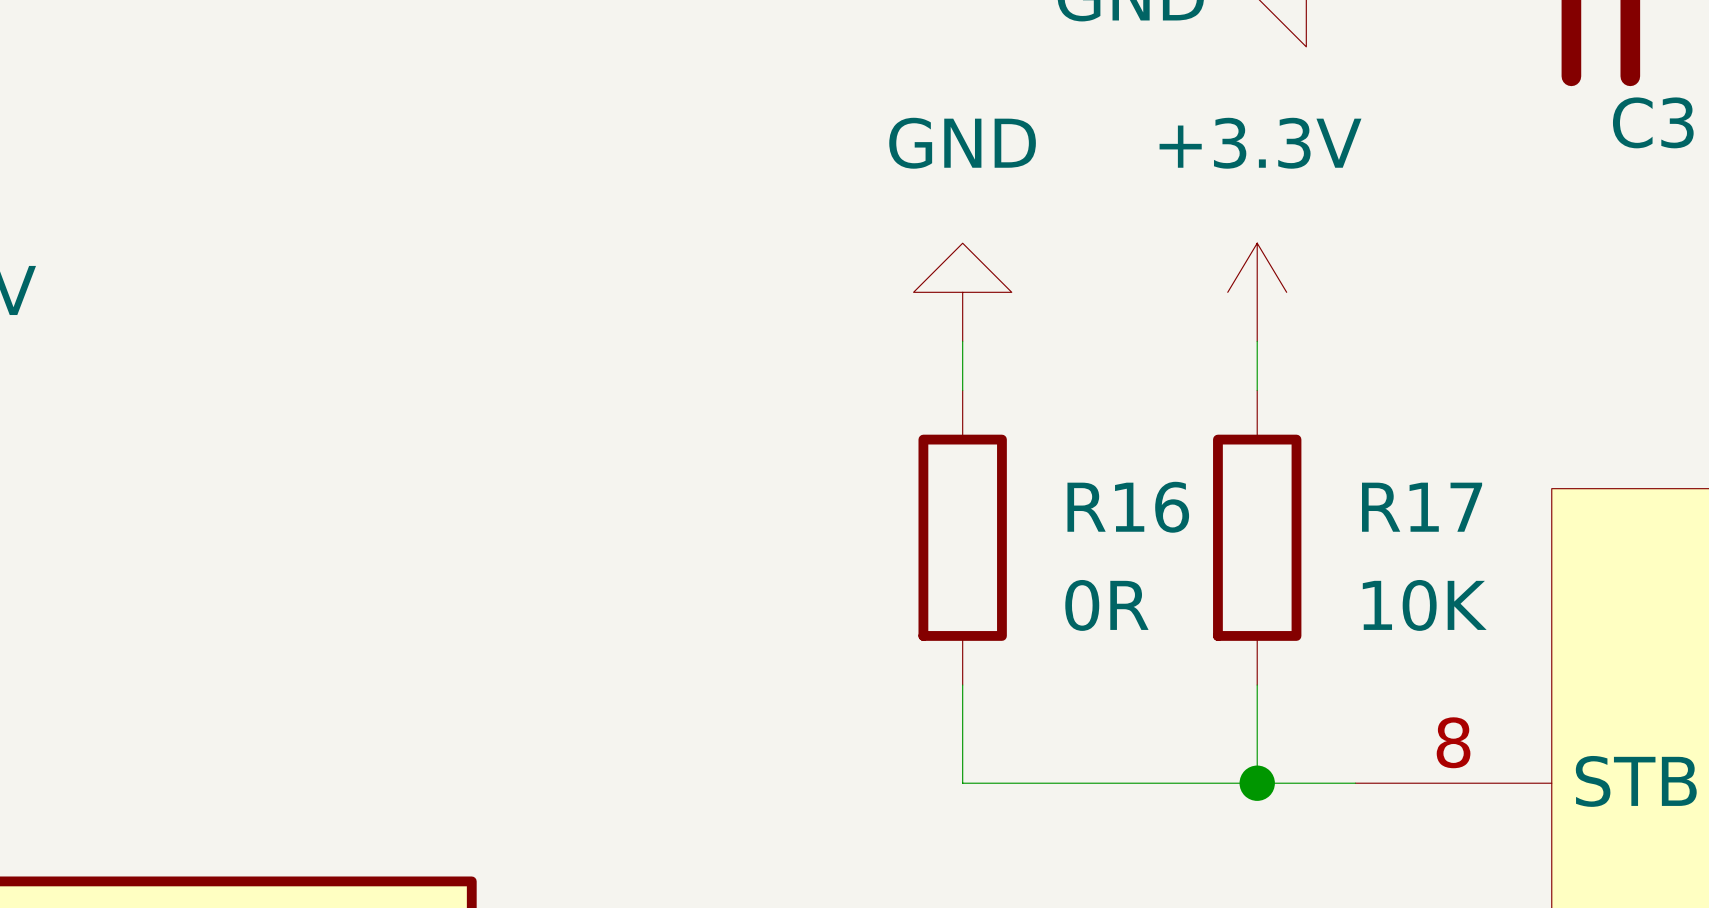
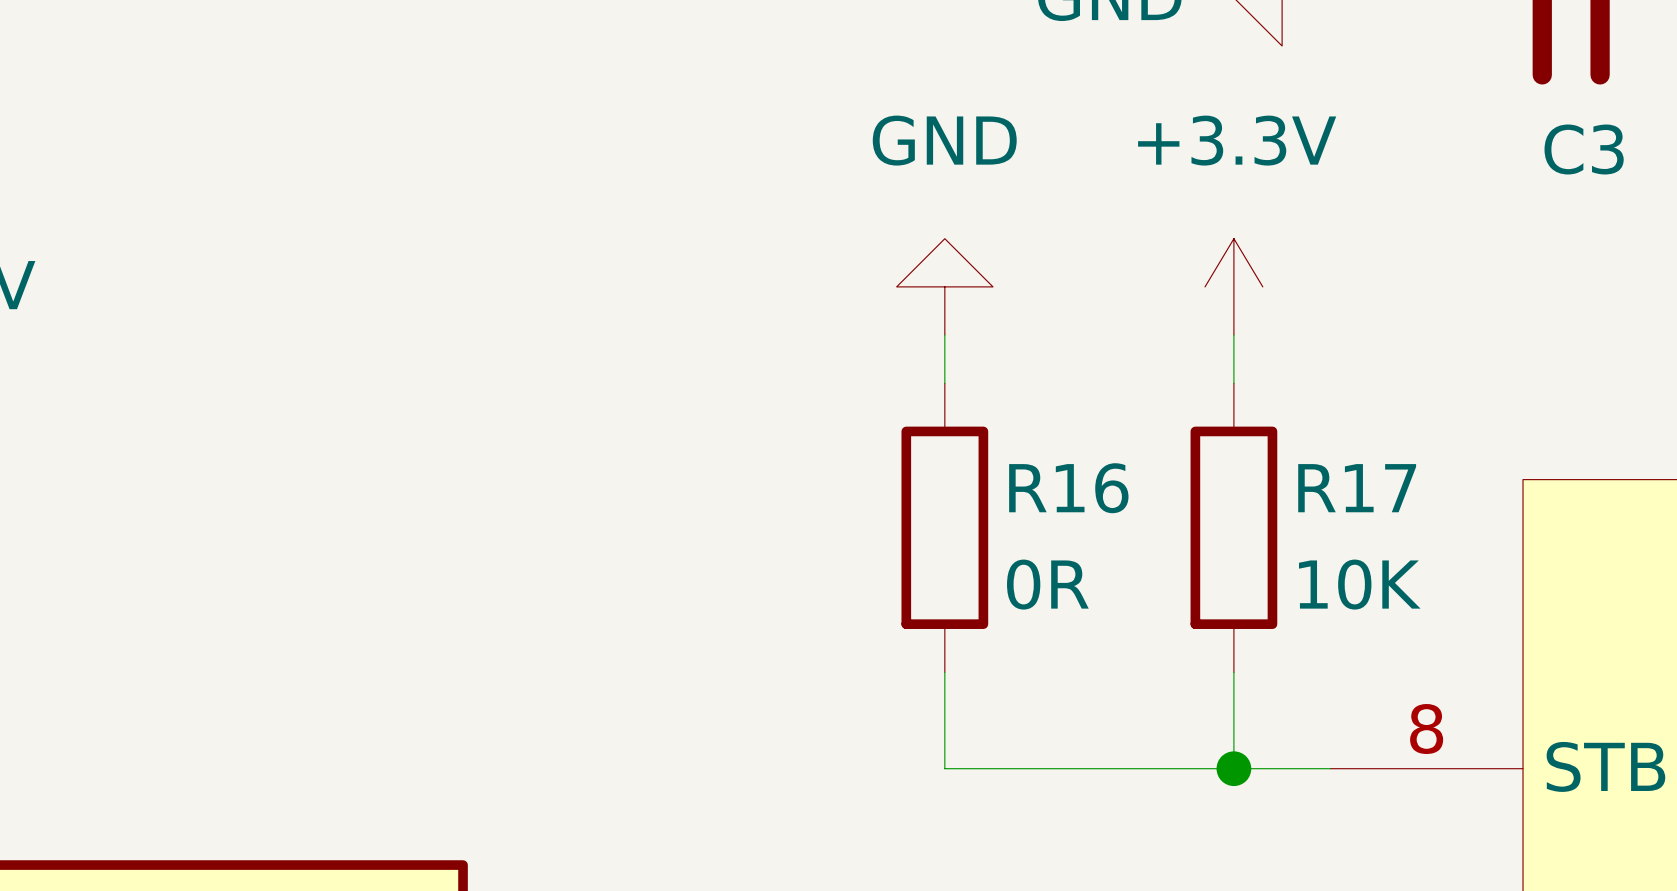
C3 name position: C3 (1653, 122) -> C3 (1584, 149)
R16 name position: R16 (1128, 507) -> R16 (1068, 488)
R17 name position: R17 (1422, 507) -> R17 (1357, 488)
R16 value position: 0R (1106, 605) -> 0R (1047, 584)
R17 value position: 10K (1424, 605) -> 10K (1359, 584)

